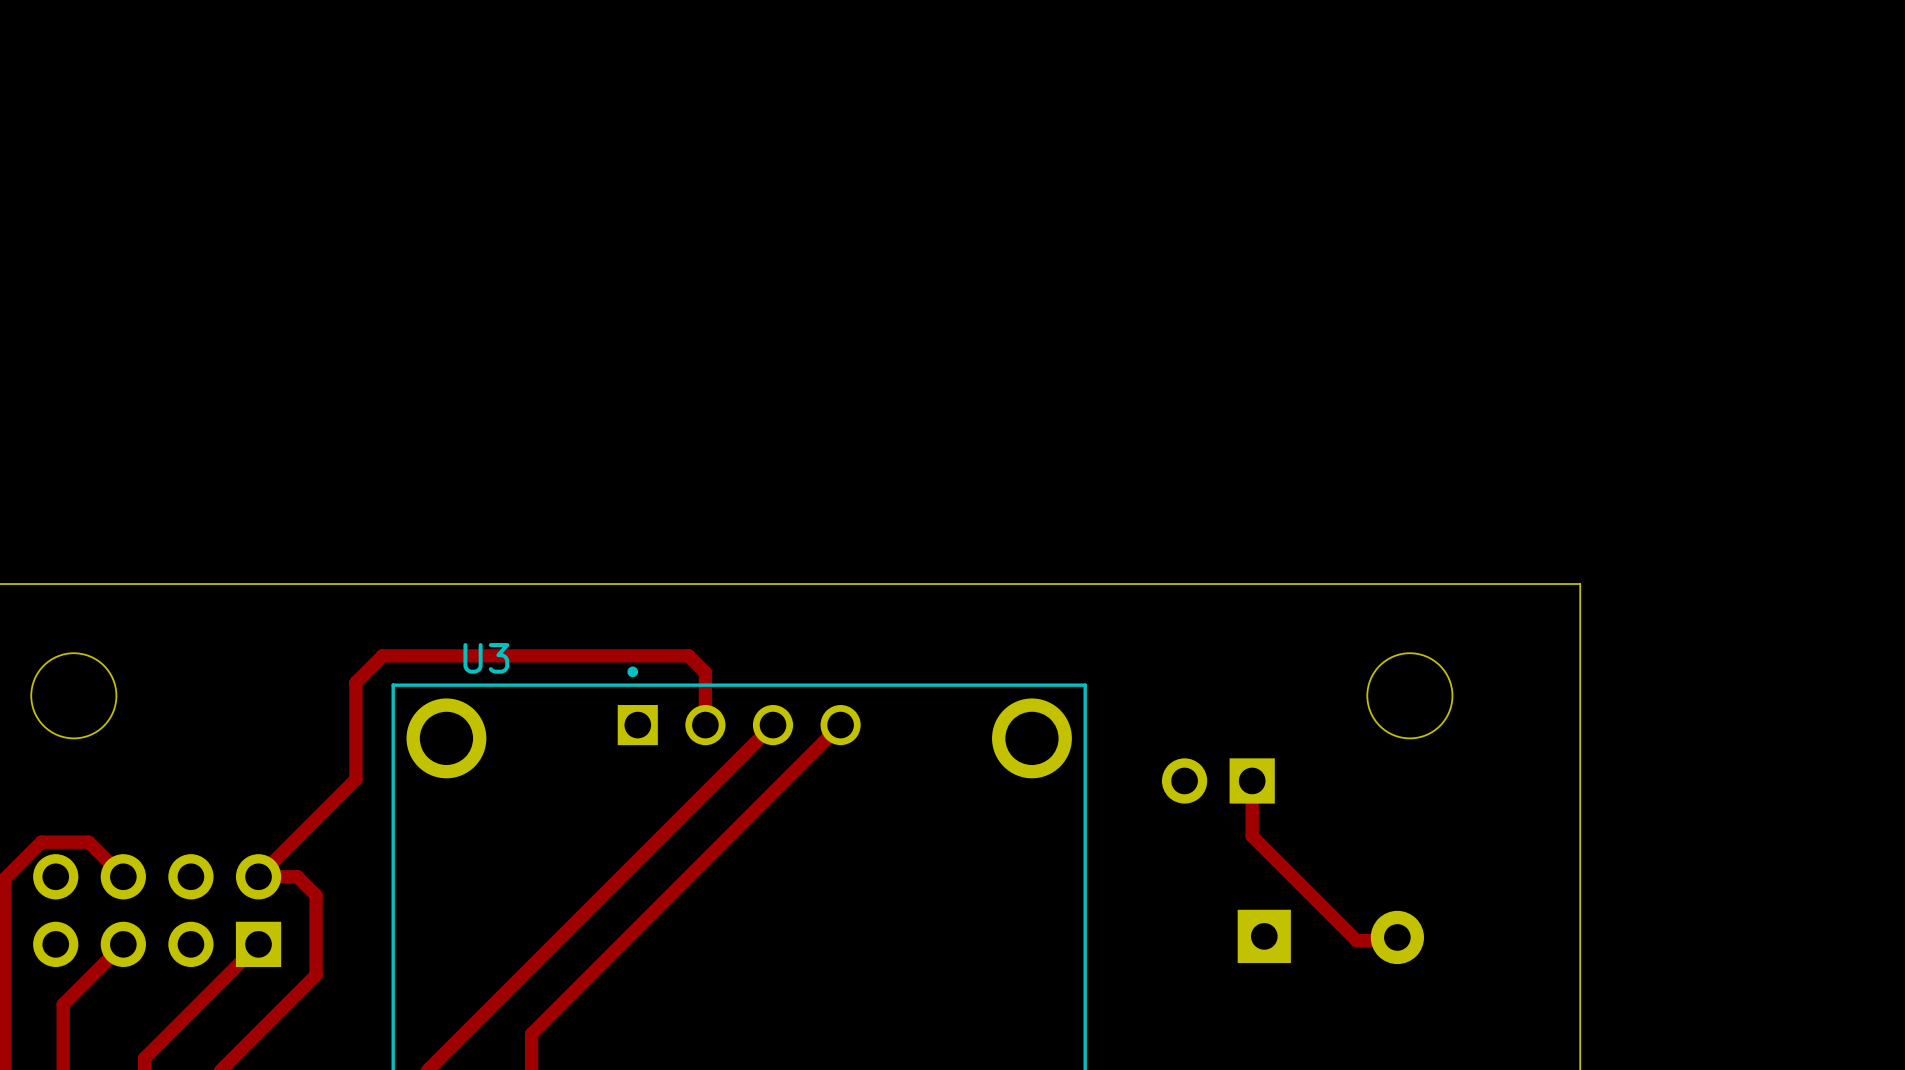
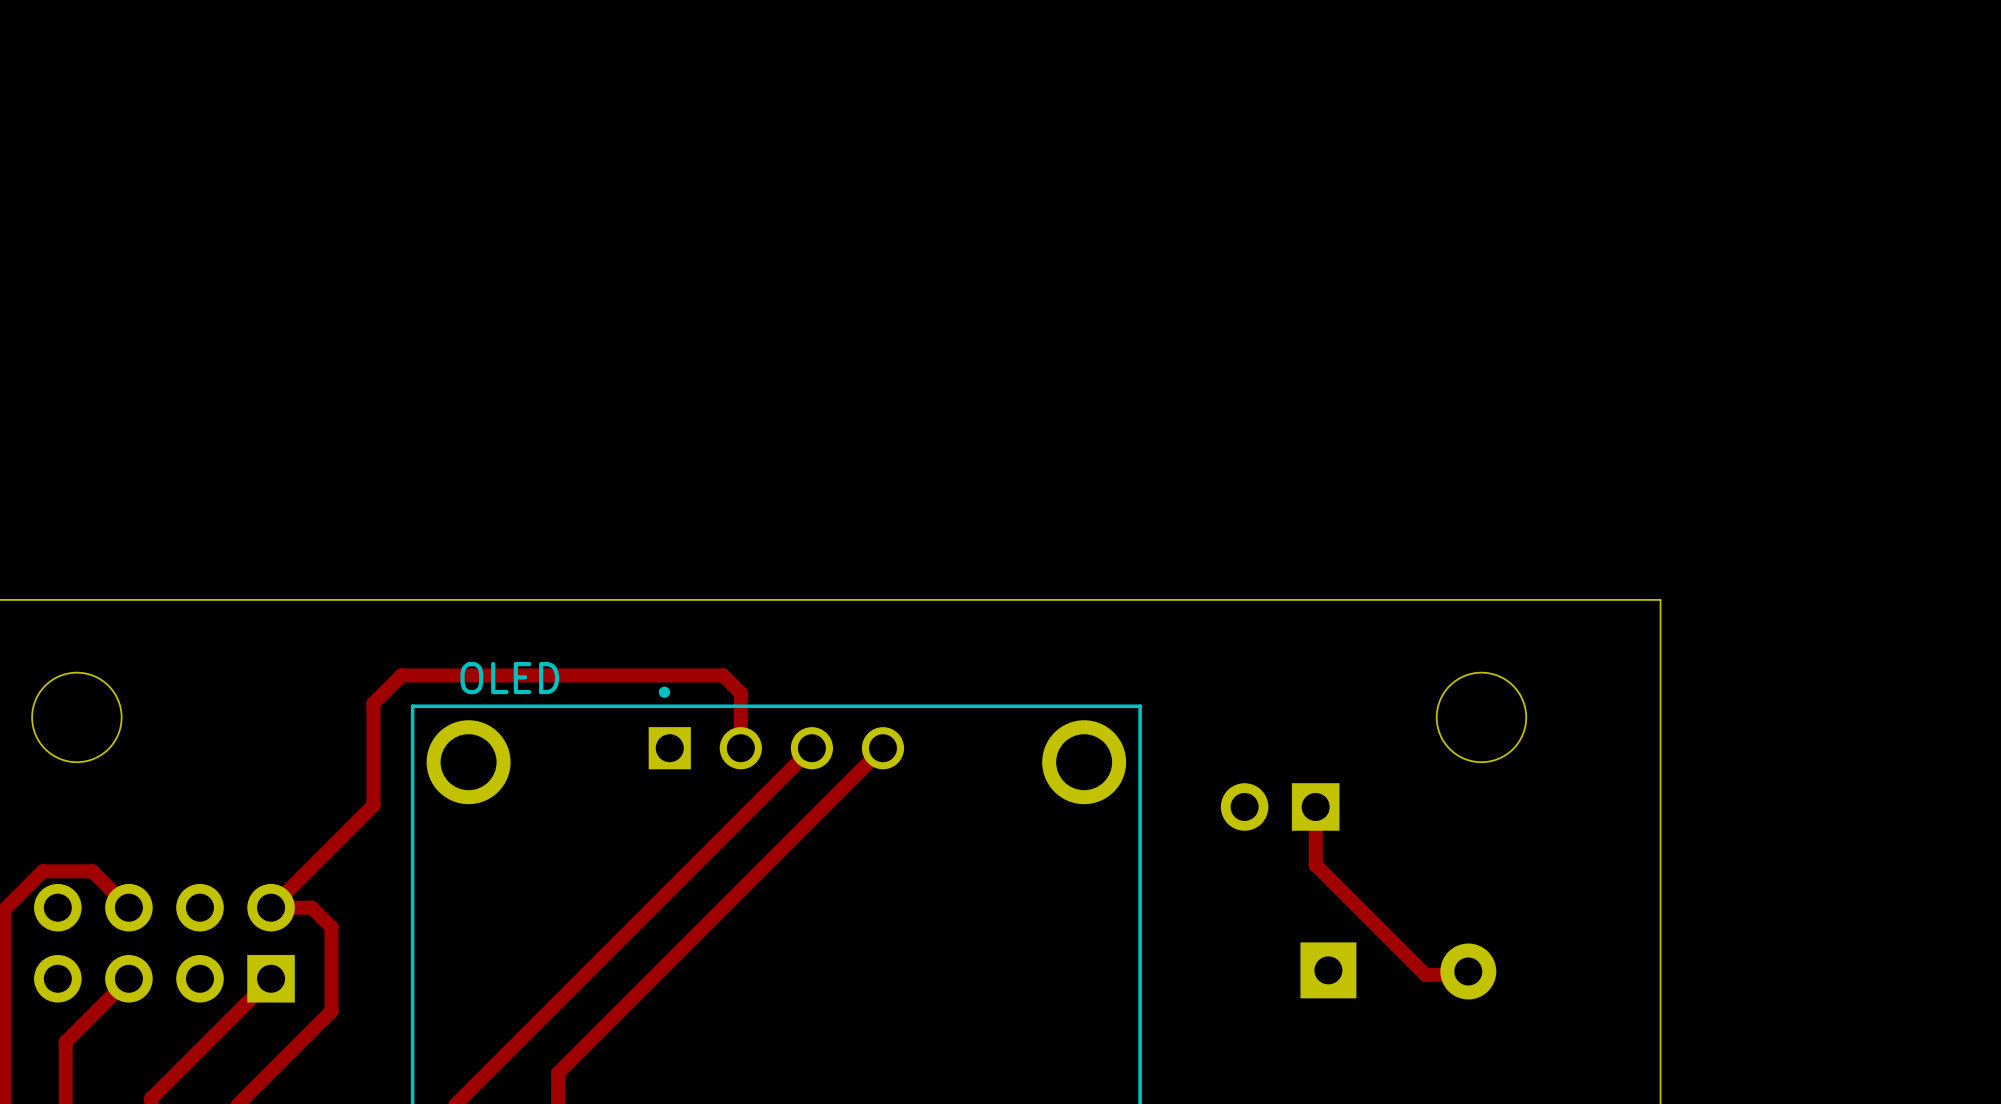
U3 name: U3 (486, 658) -> OLED (509, 678)

